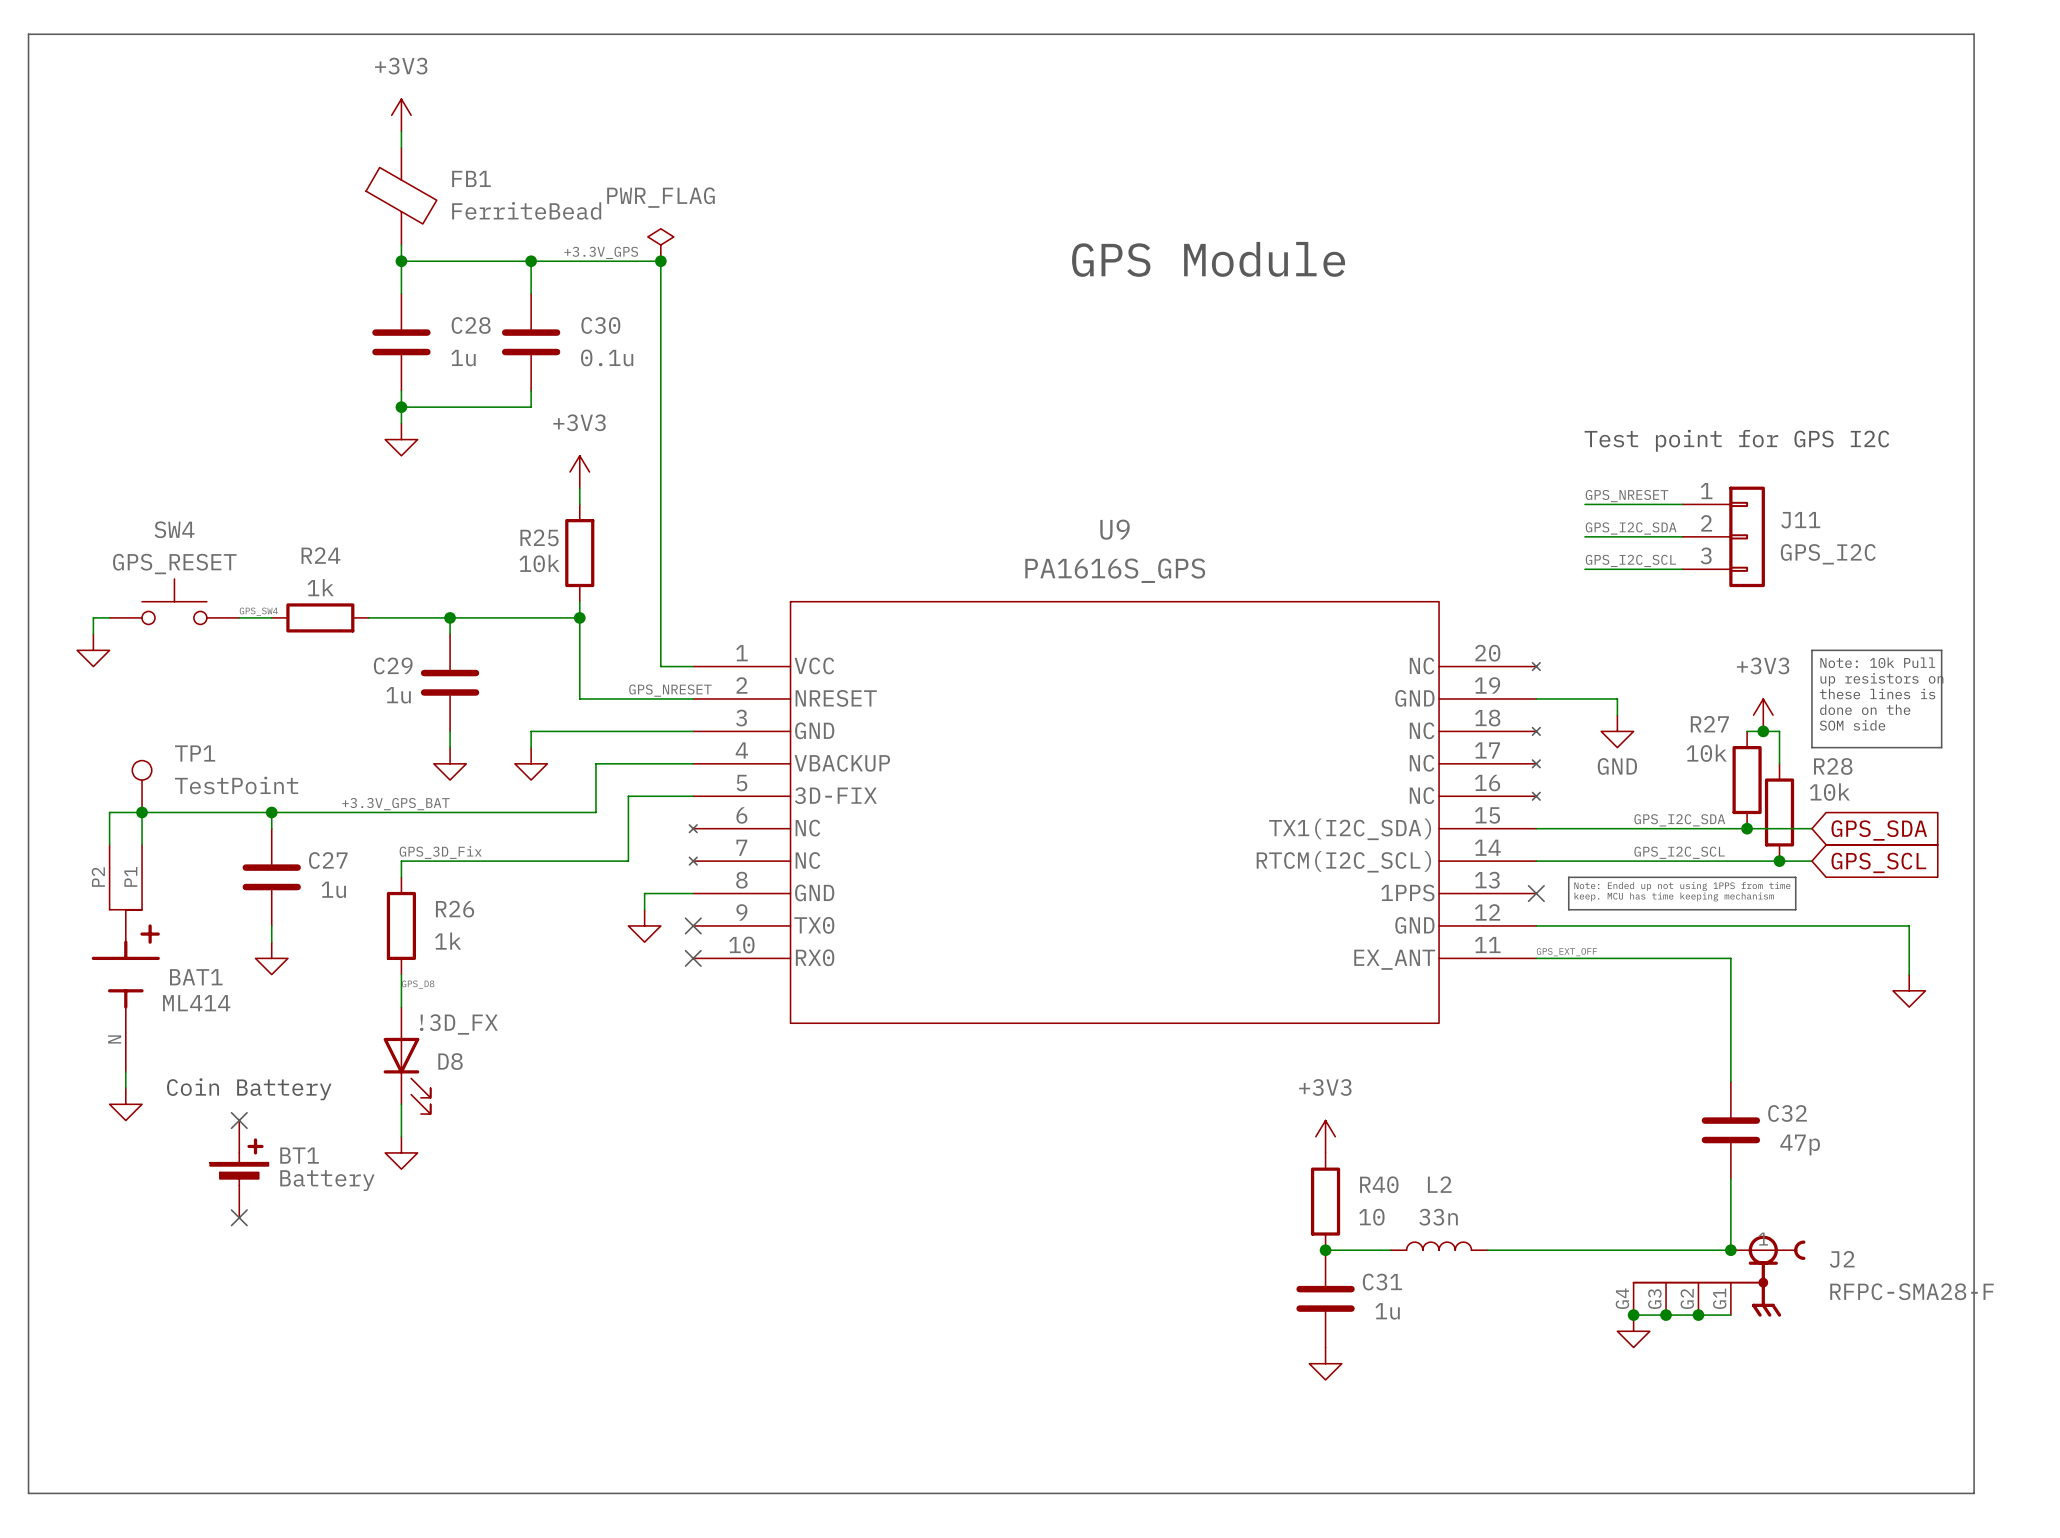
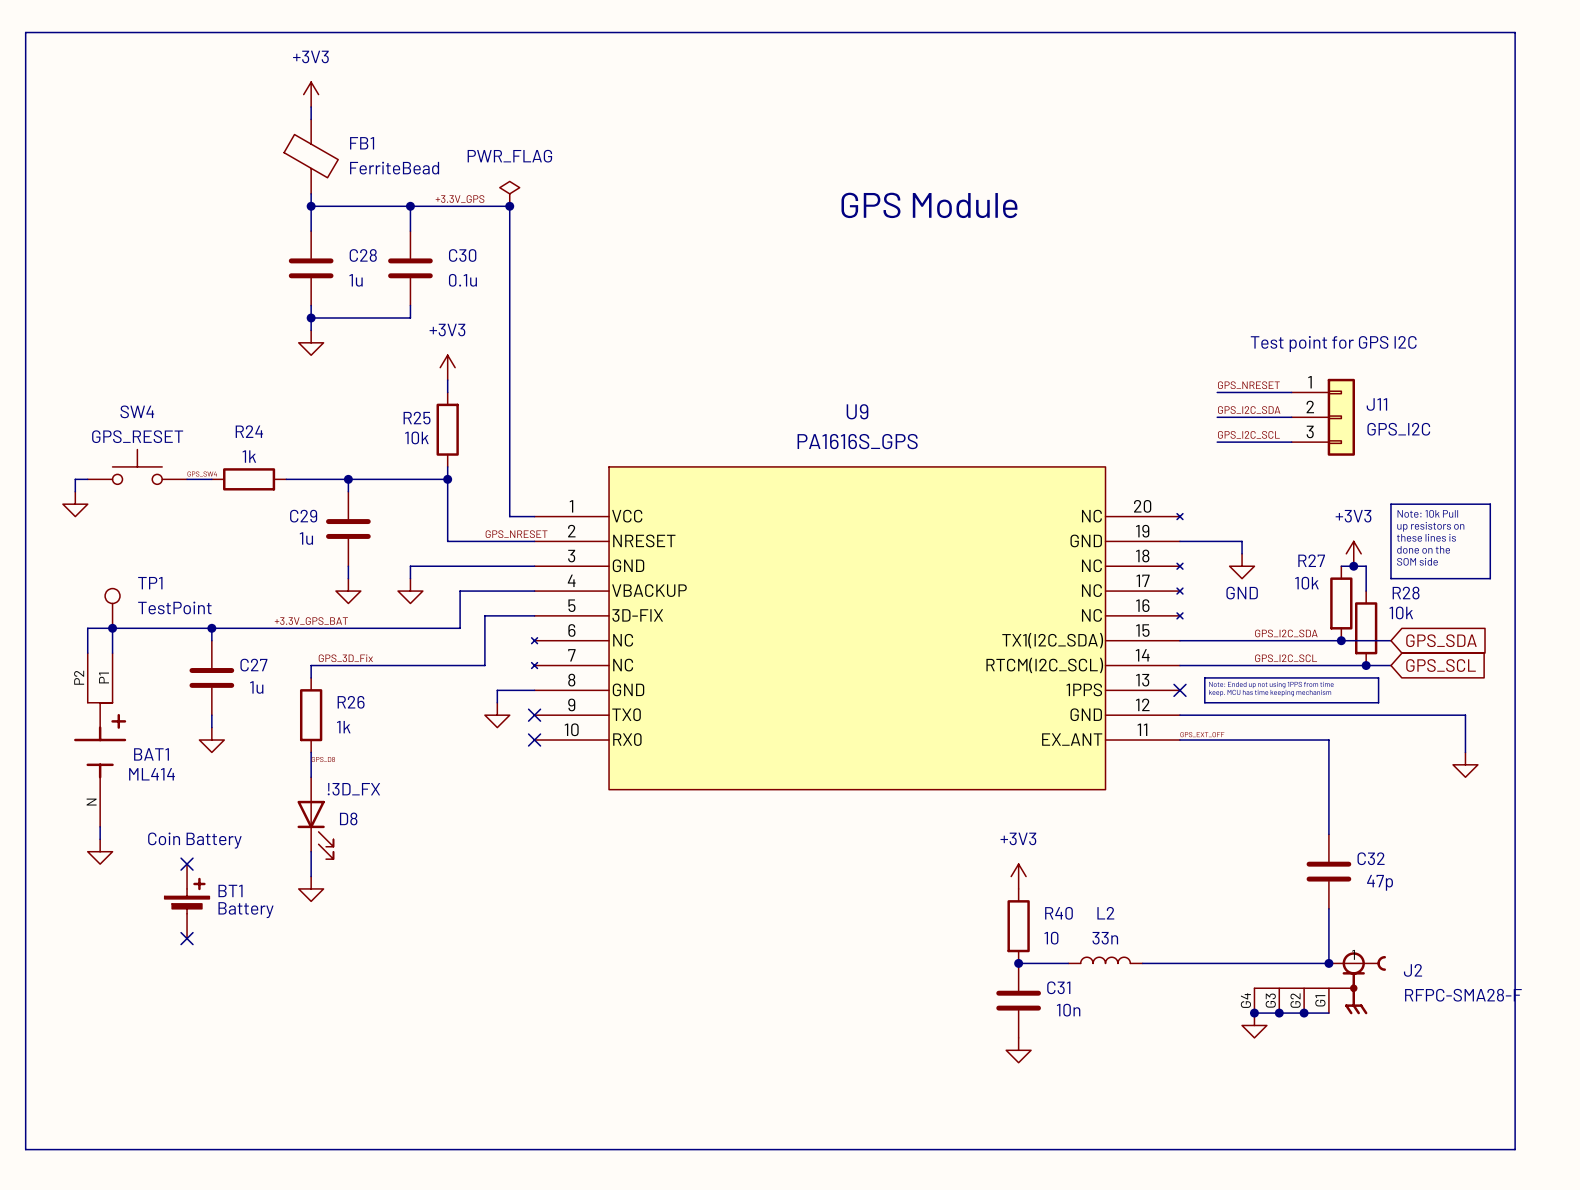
C31 value: 1u (1387, 1311) -> 10n (1068, 1010)

